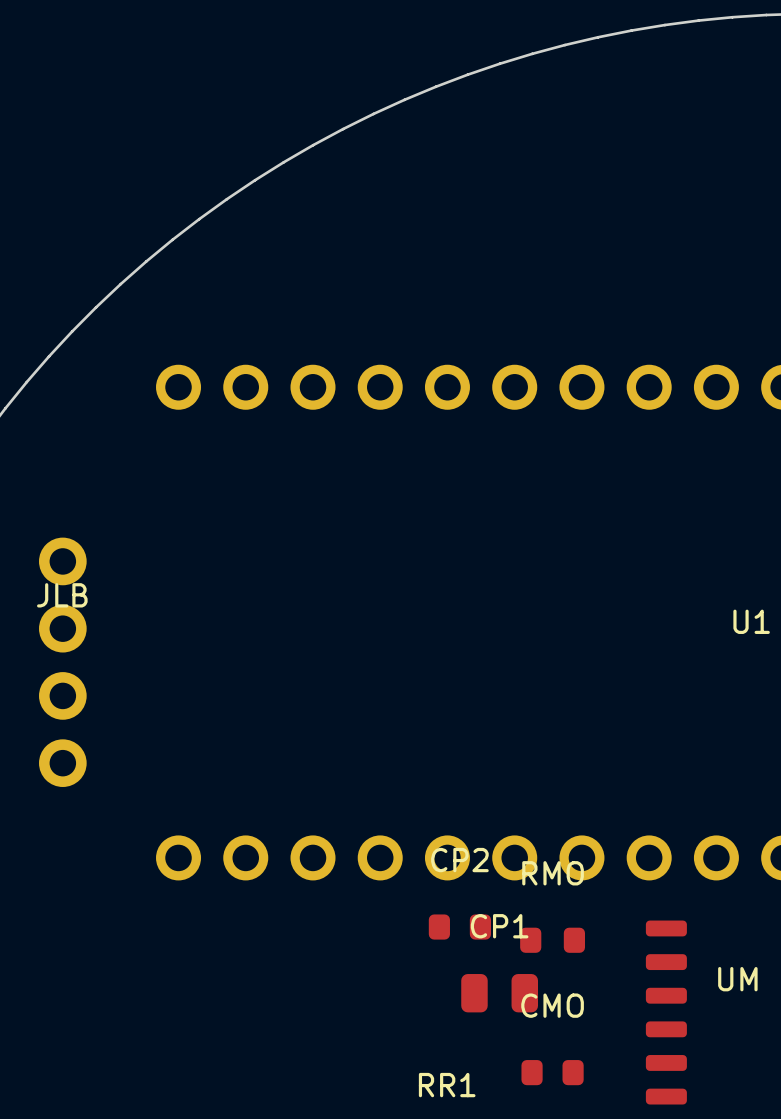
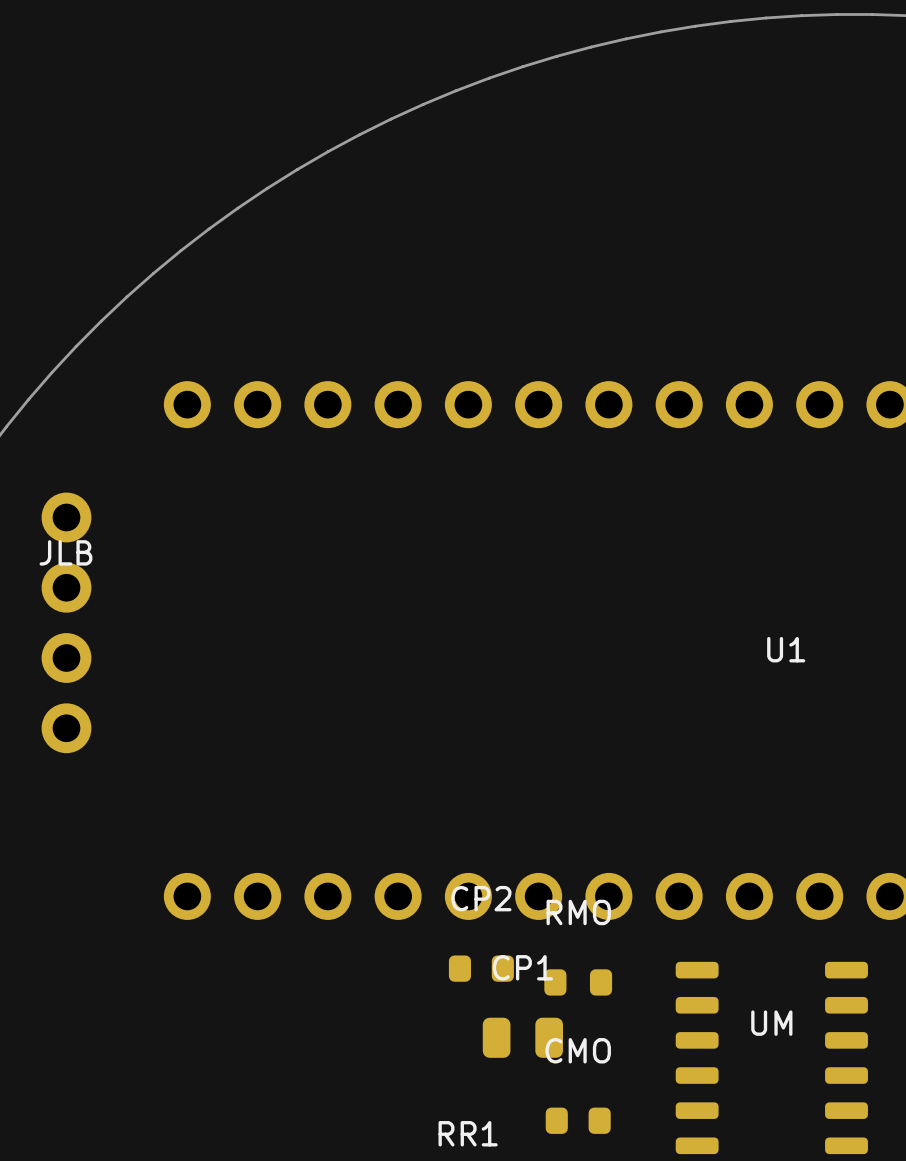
JLB position: (62, 662) -> (66, 622)

